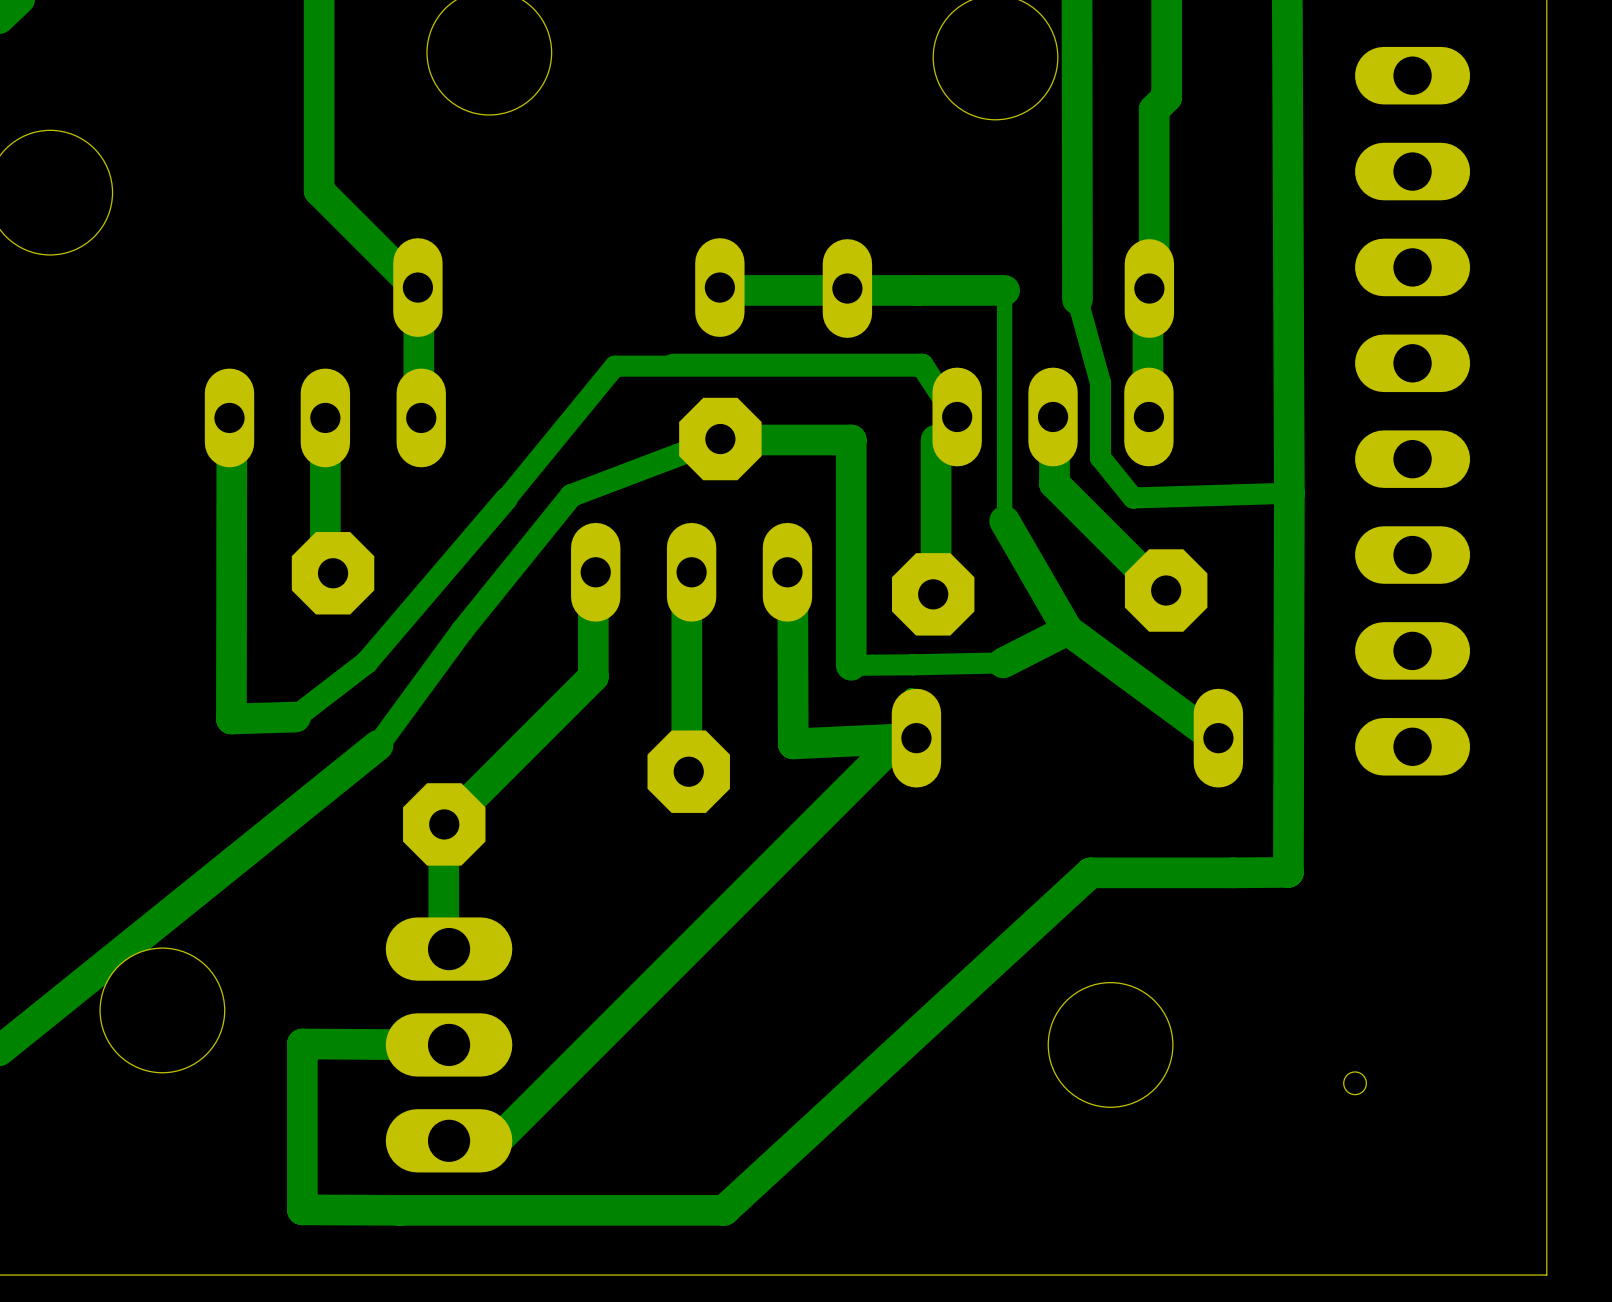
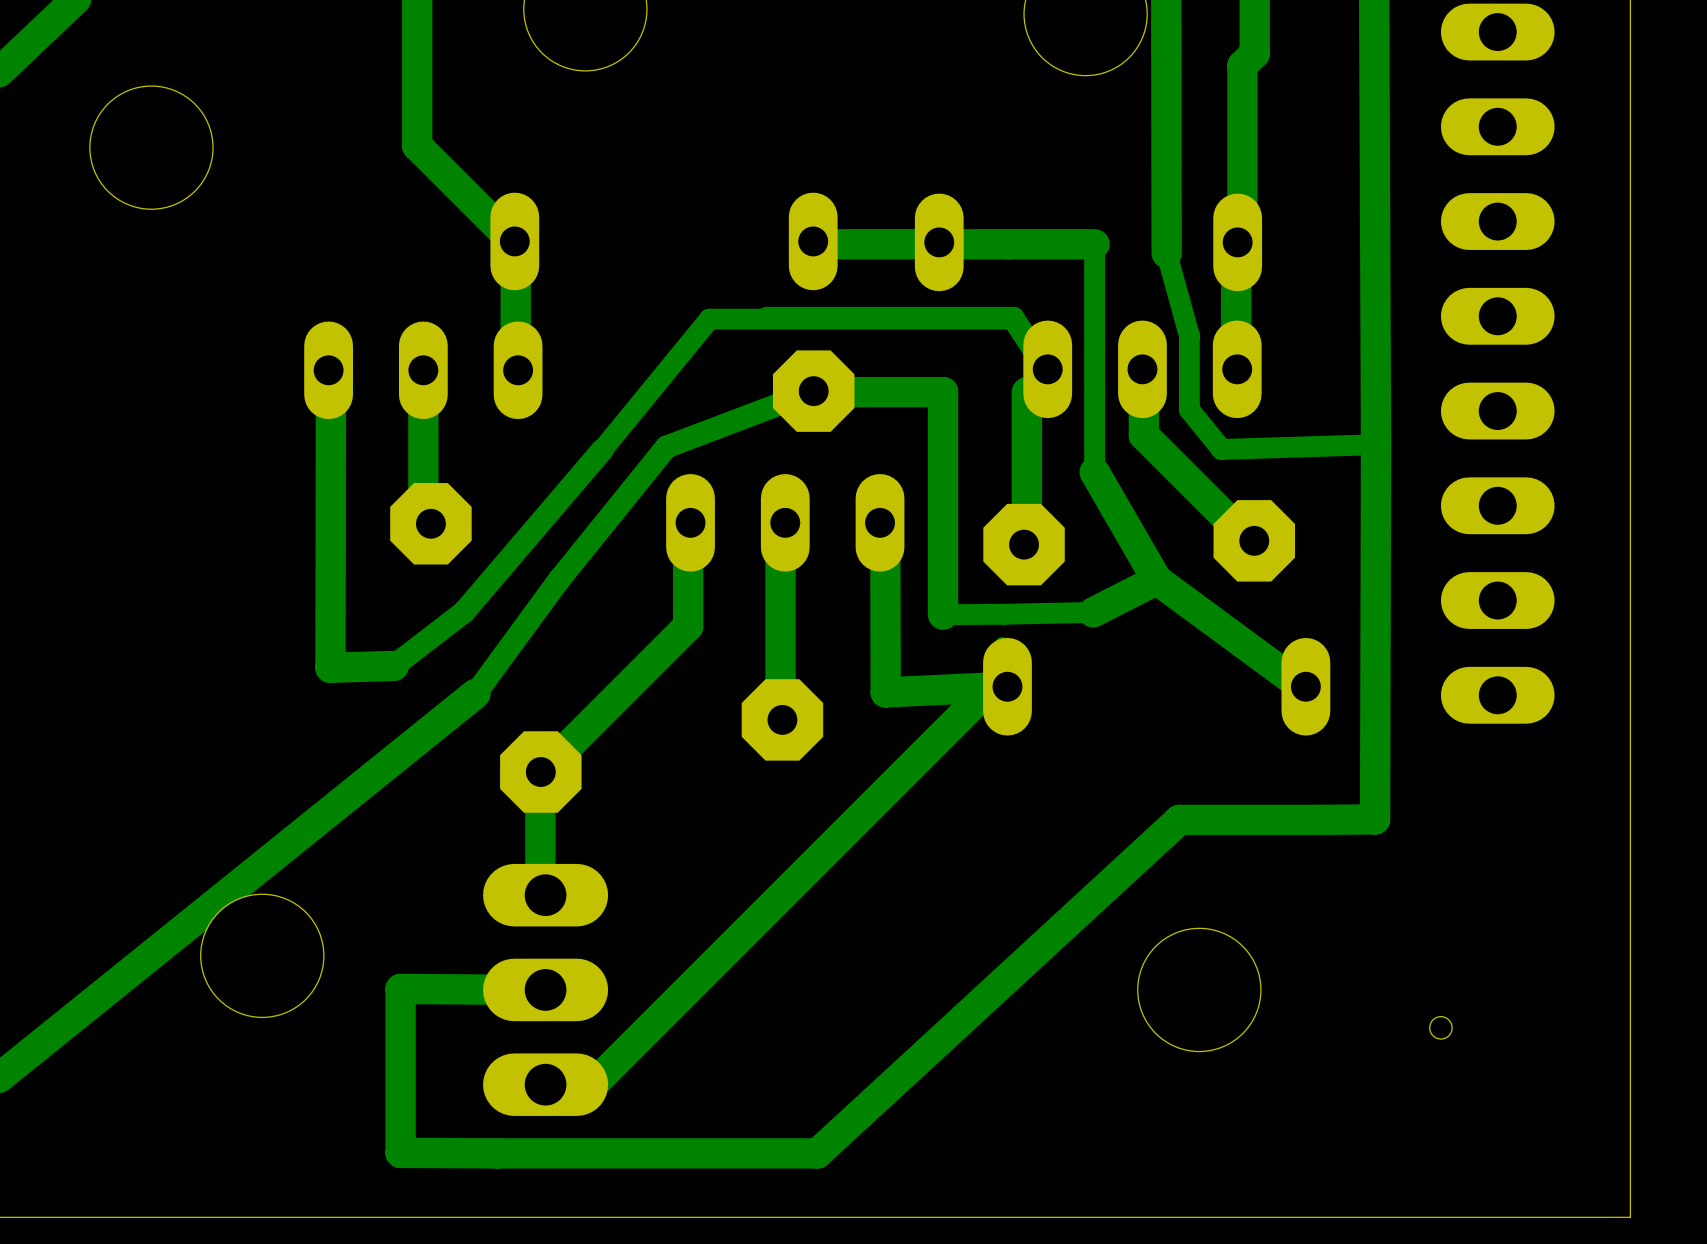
bottom track width: thin (1004, 290) (1004, 521) -> thick (1094, 244) (1094, 472)

